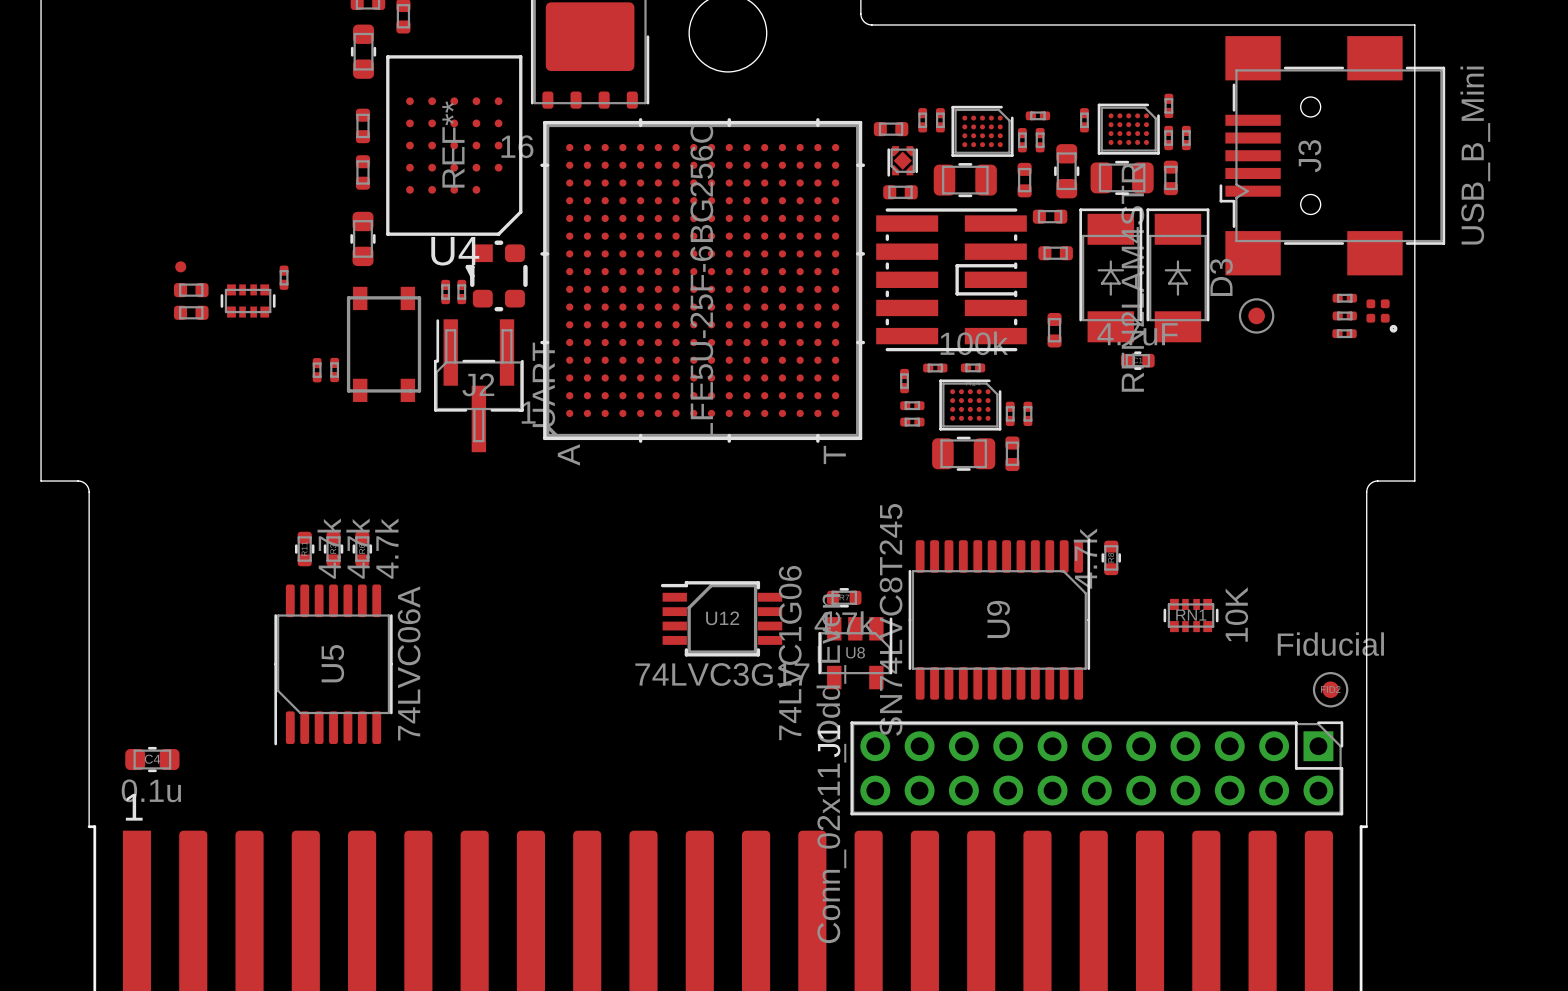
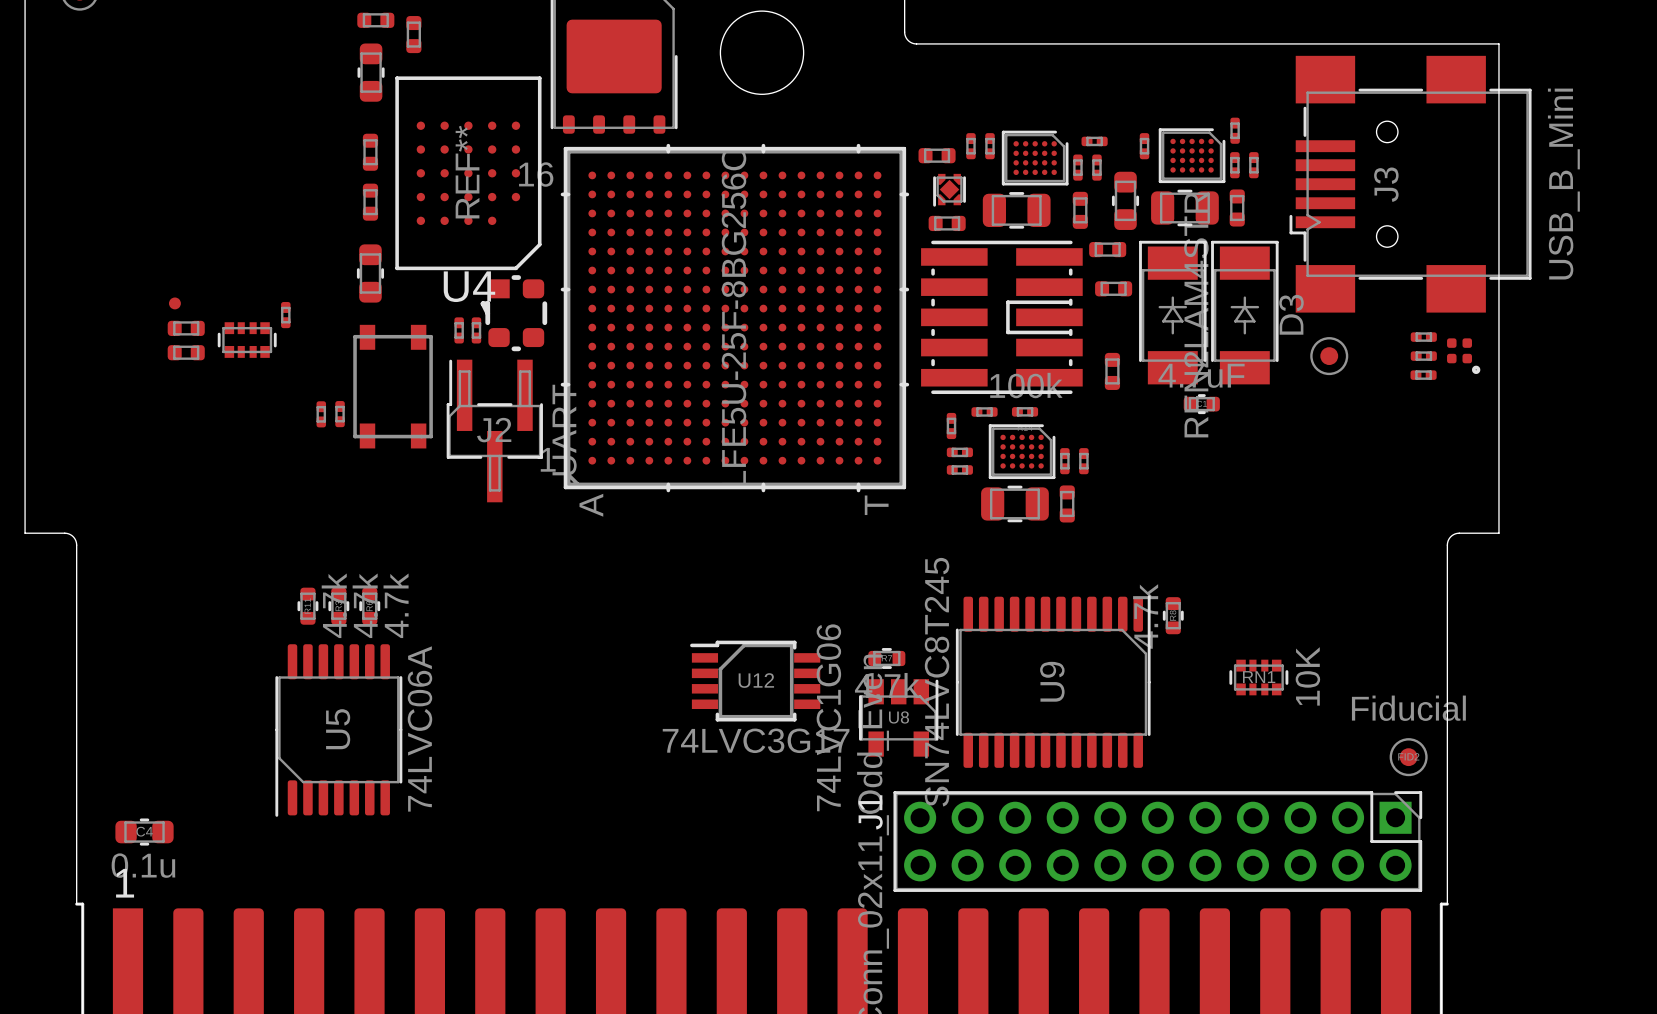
part value: LFE5U-25F-6BG256C (701, 279) -> LFE5U-25F-8BG256C (734, 317)

